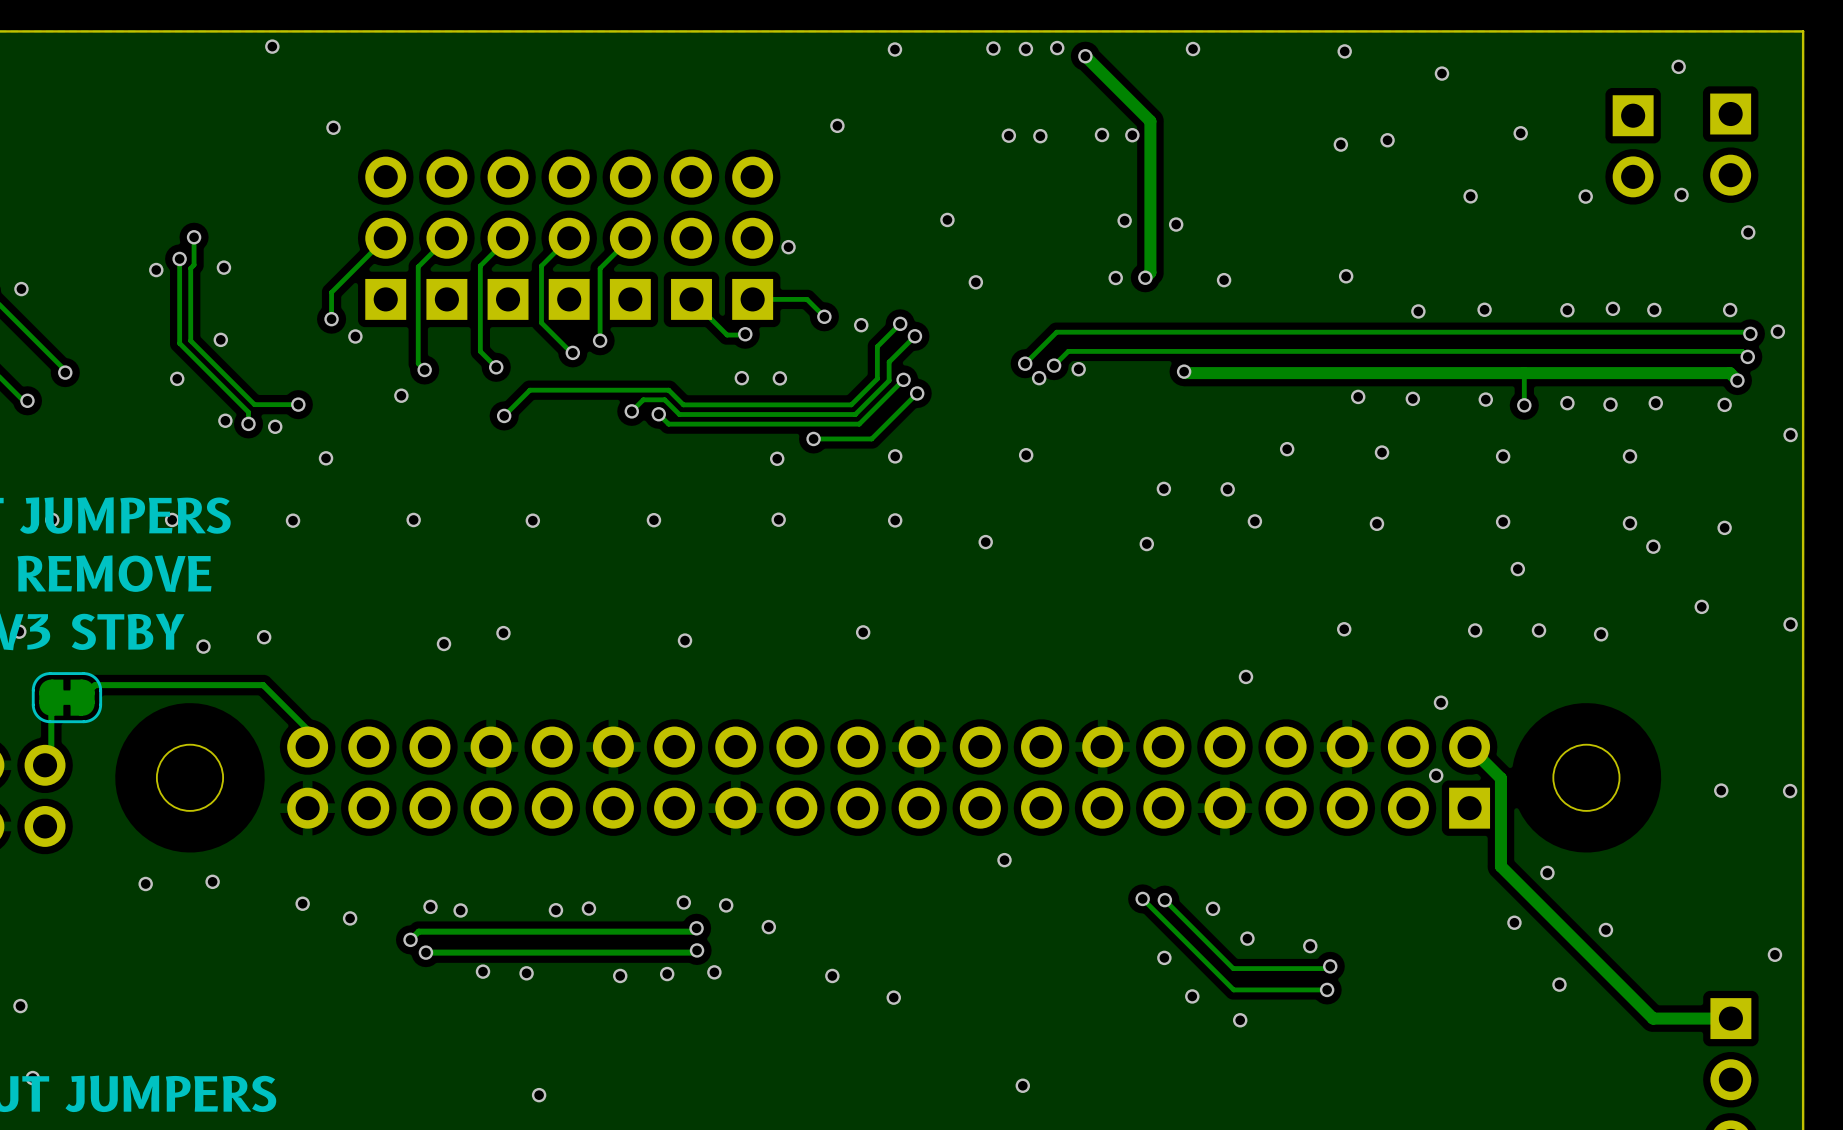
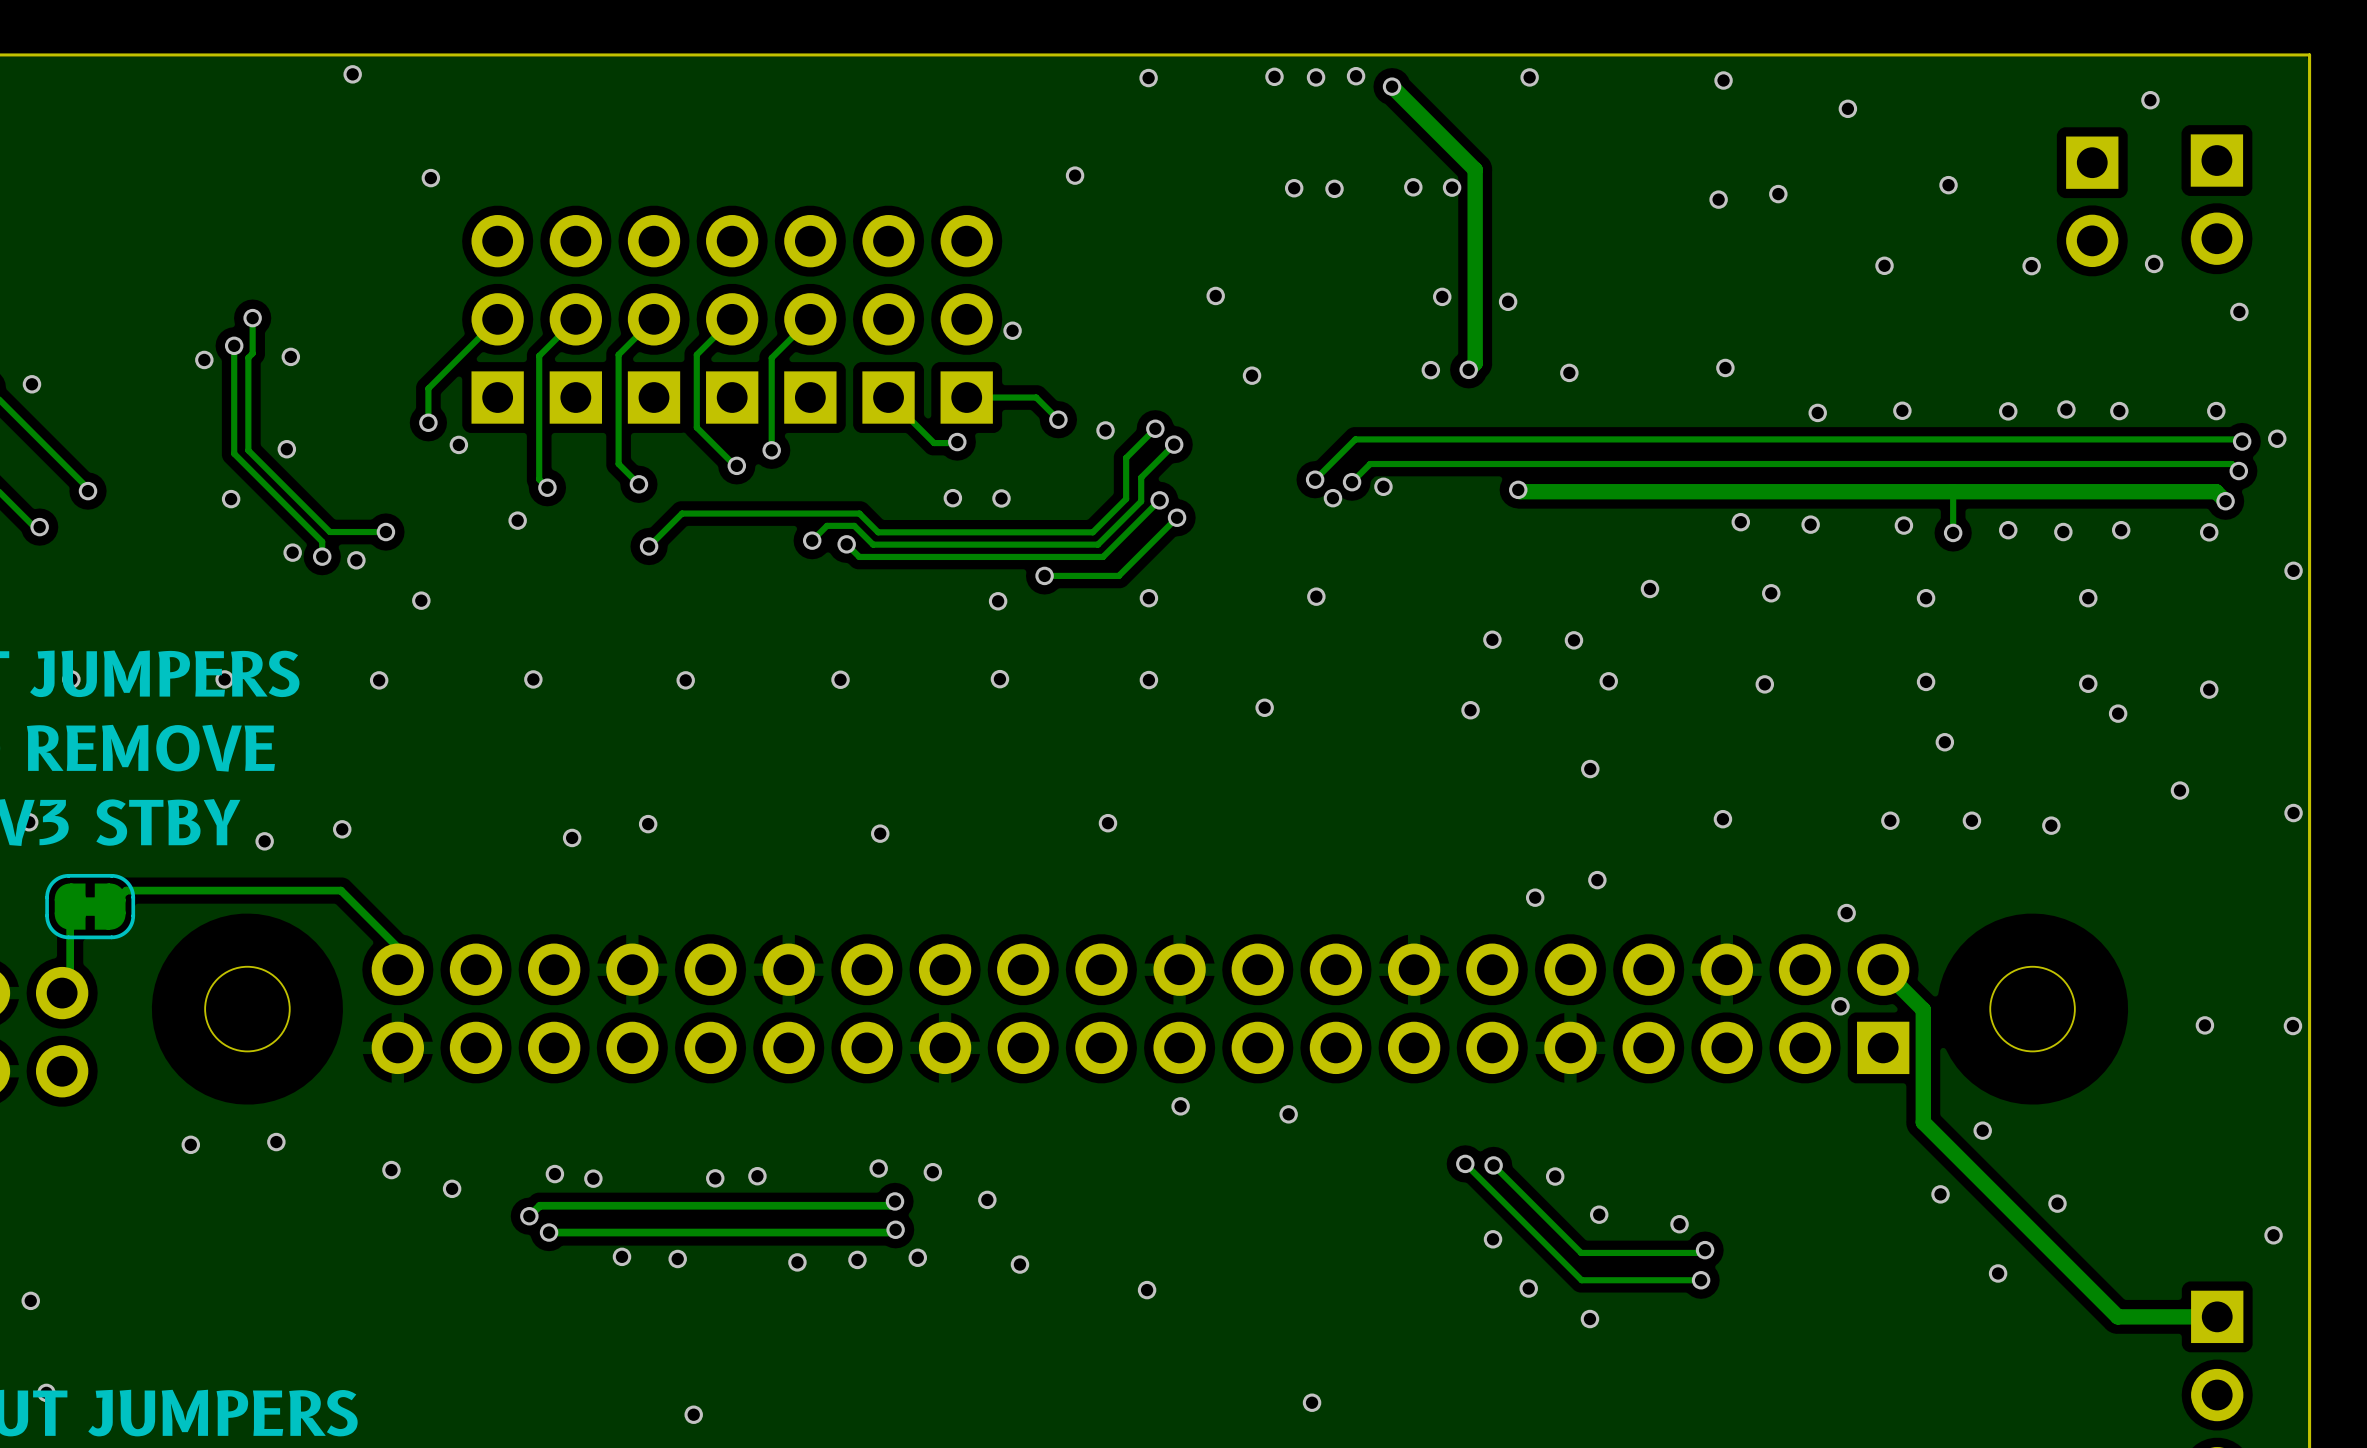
via: none -> (1590, 769)
via: none -> (1535, 897)
via: none -> (1180, 1106)
via position: (832, 975) -> (1019, 1264)

